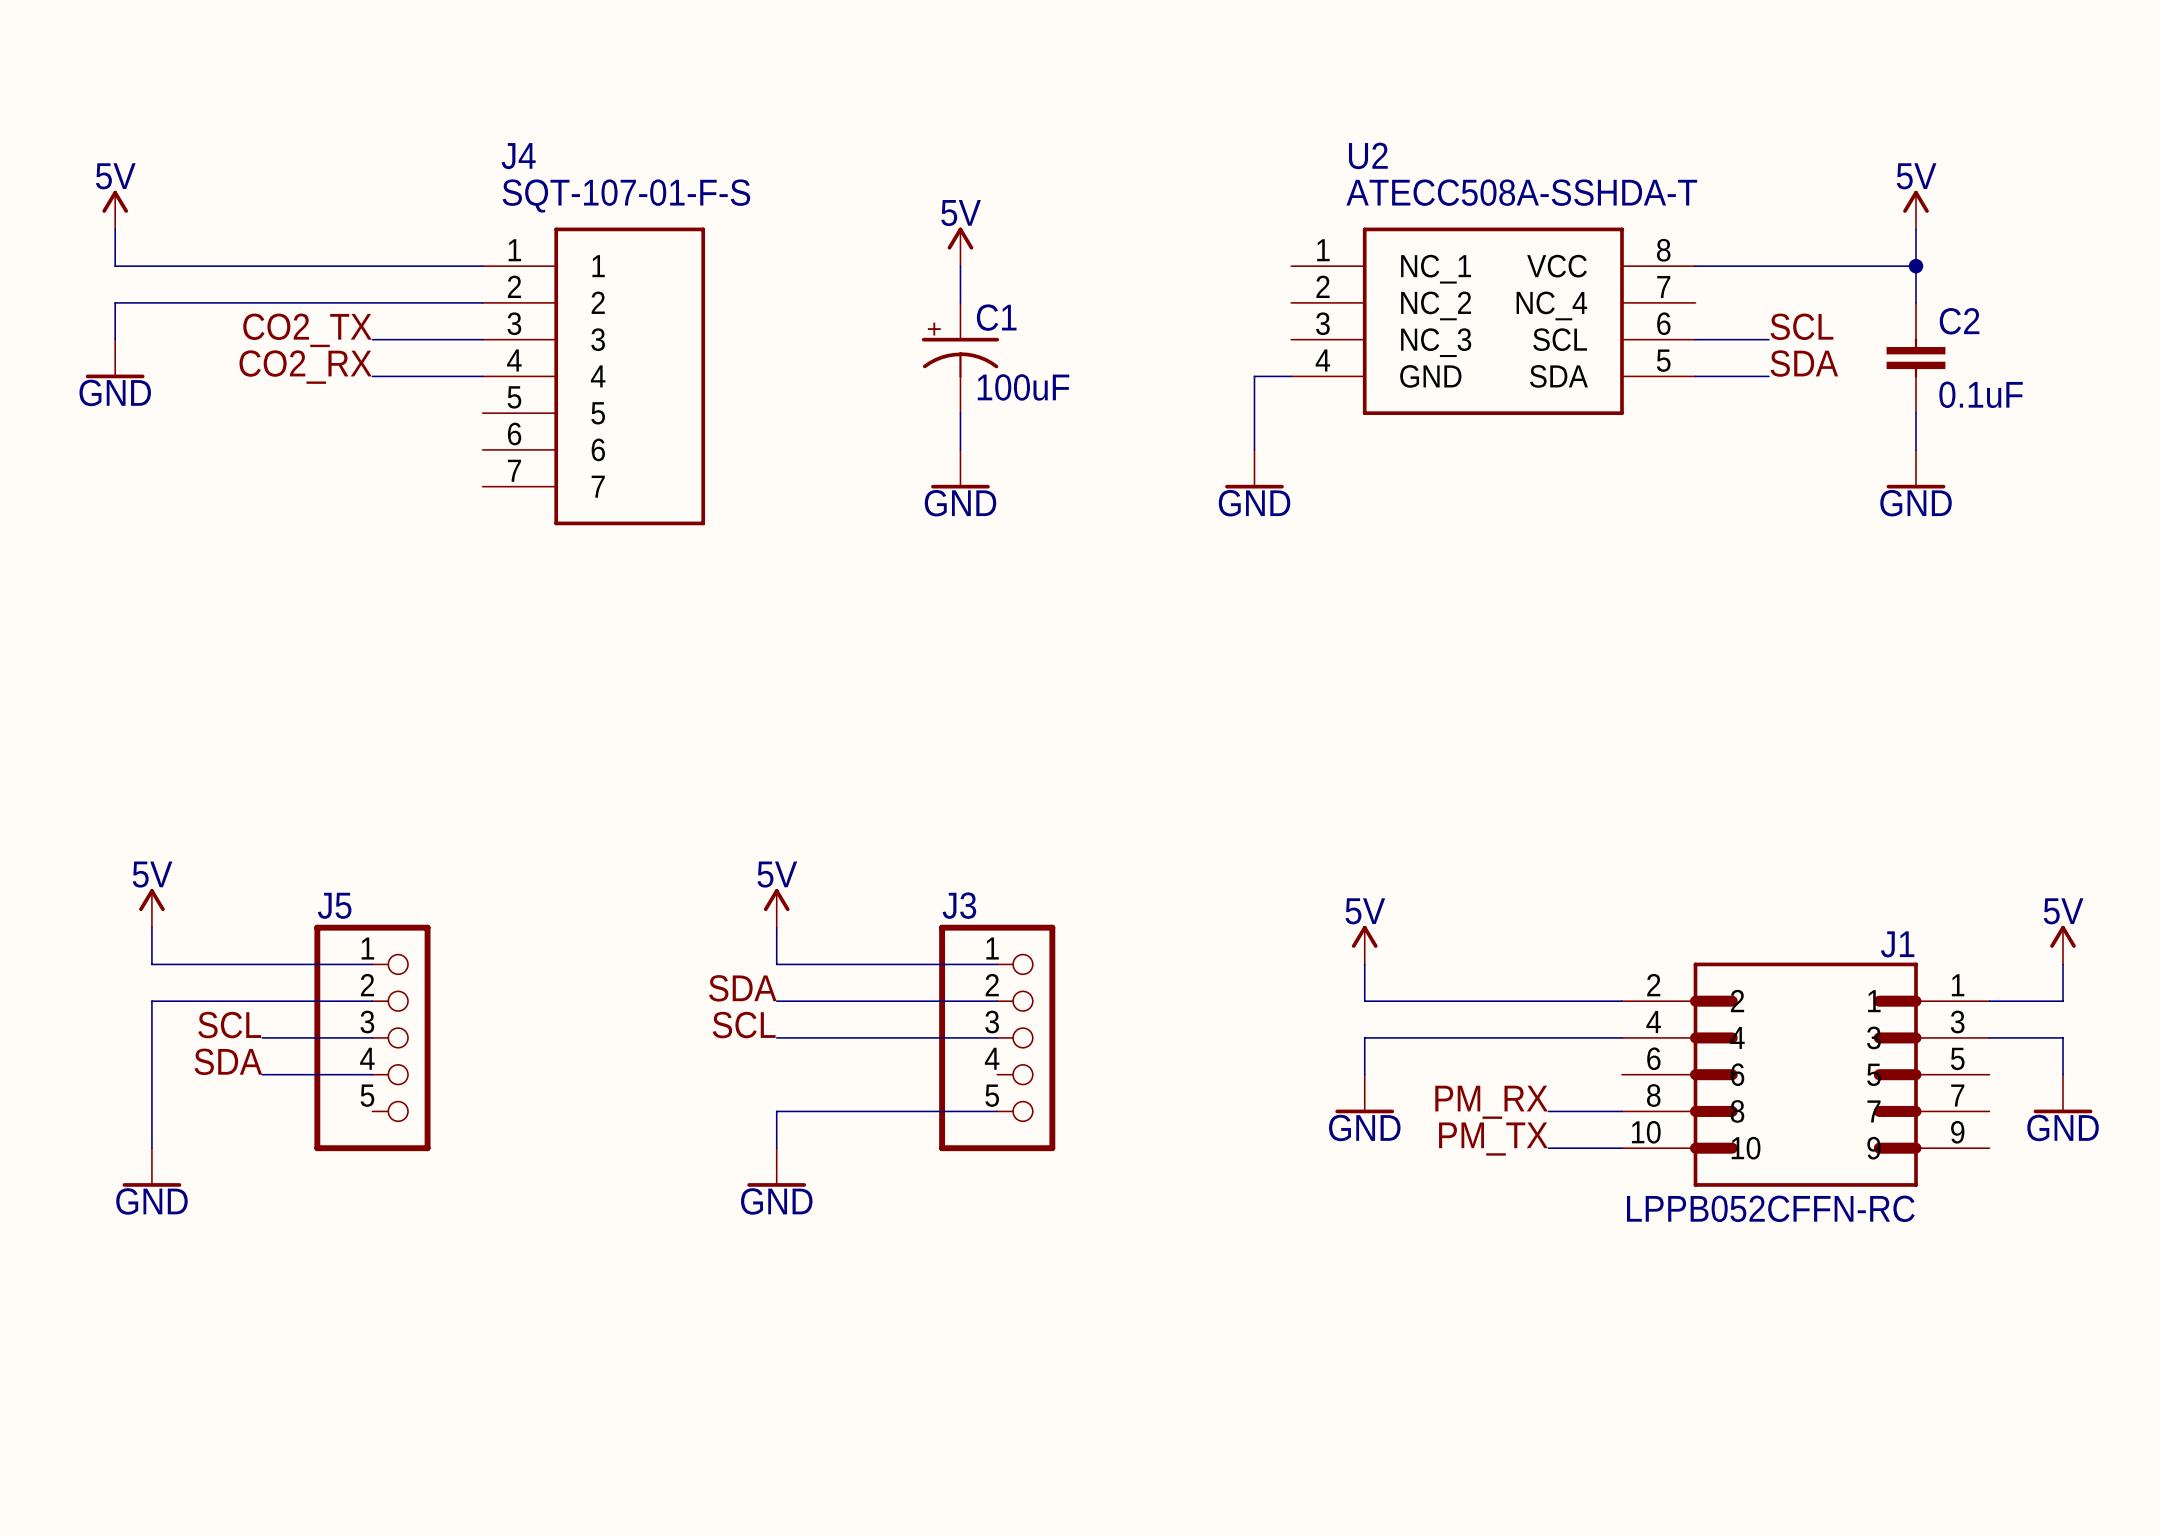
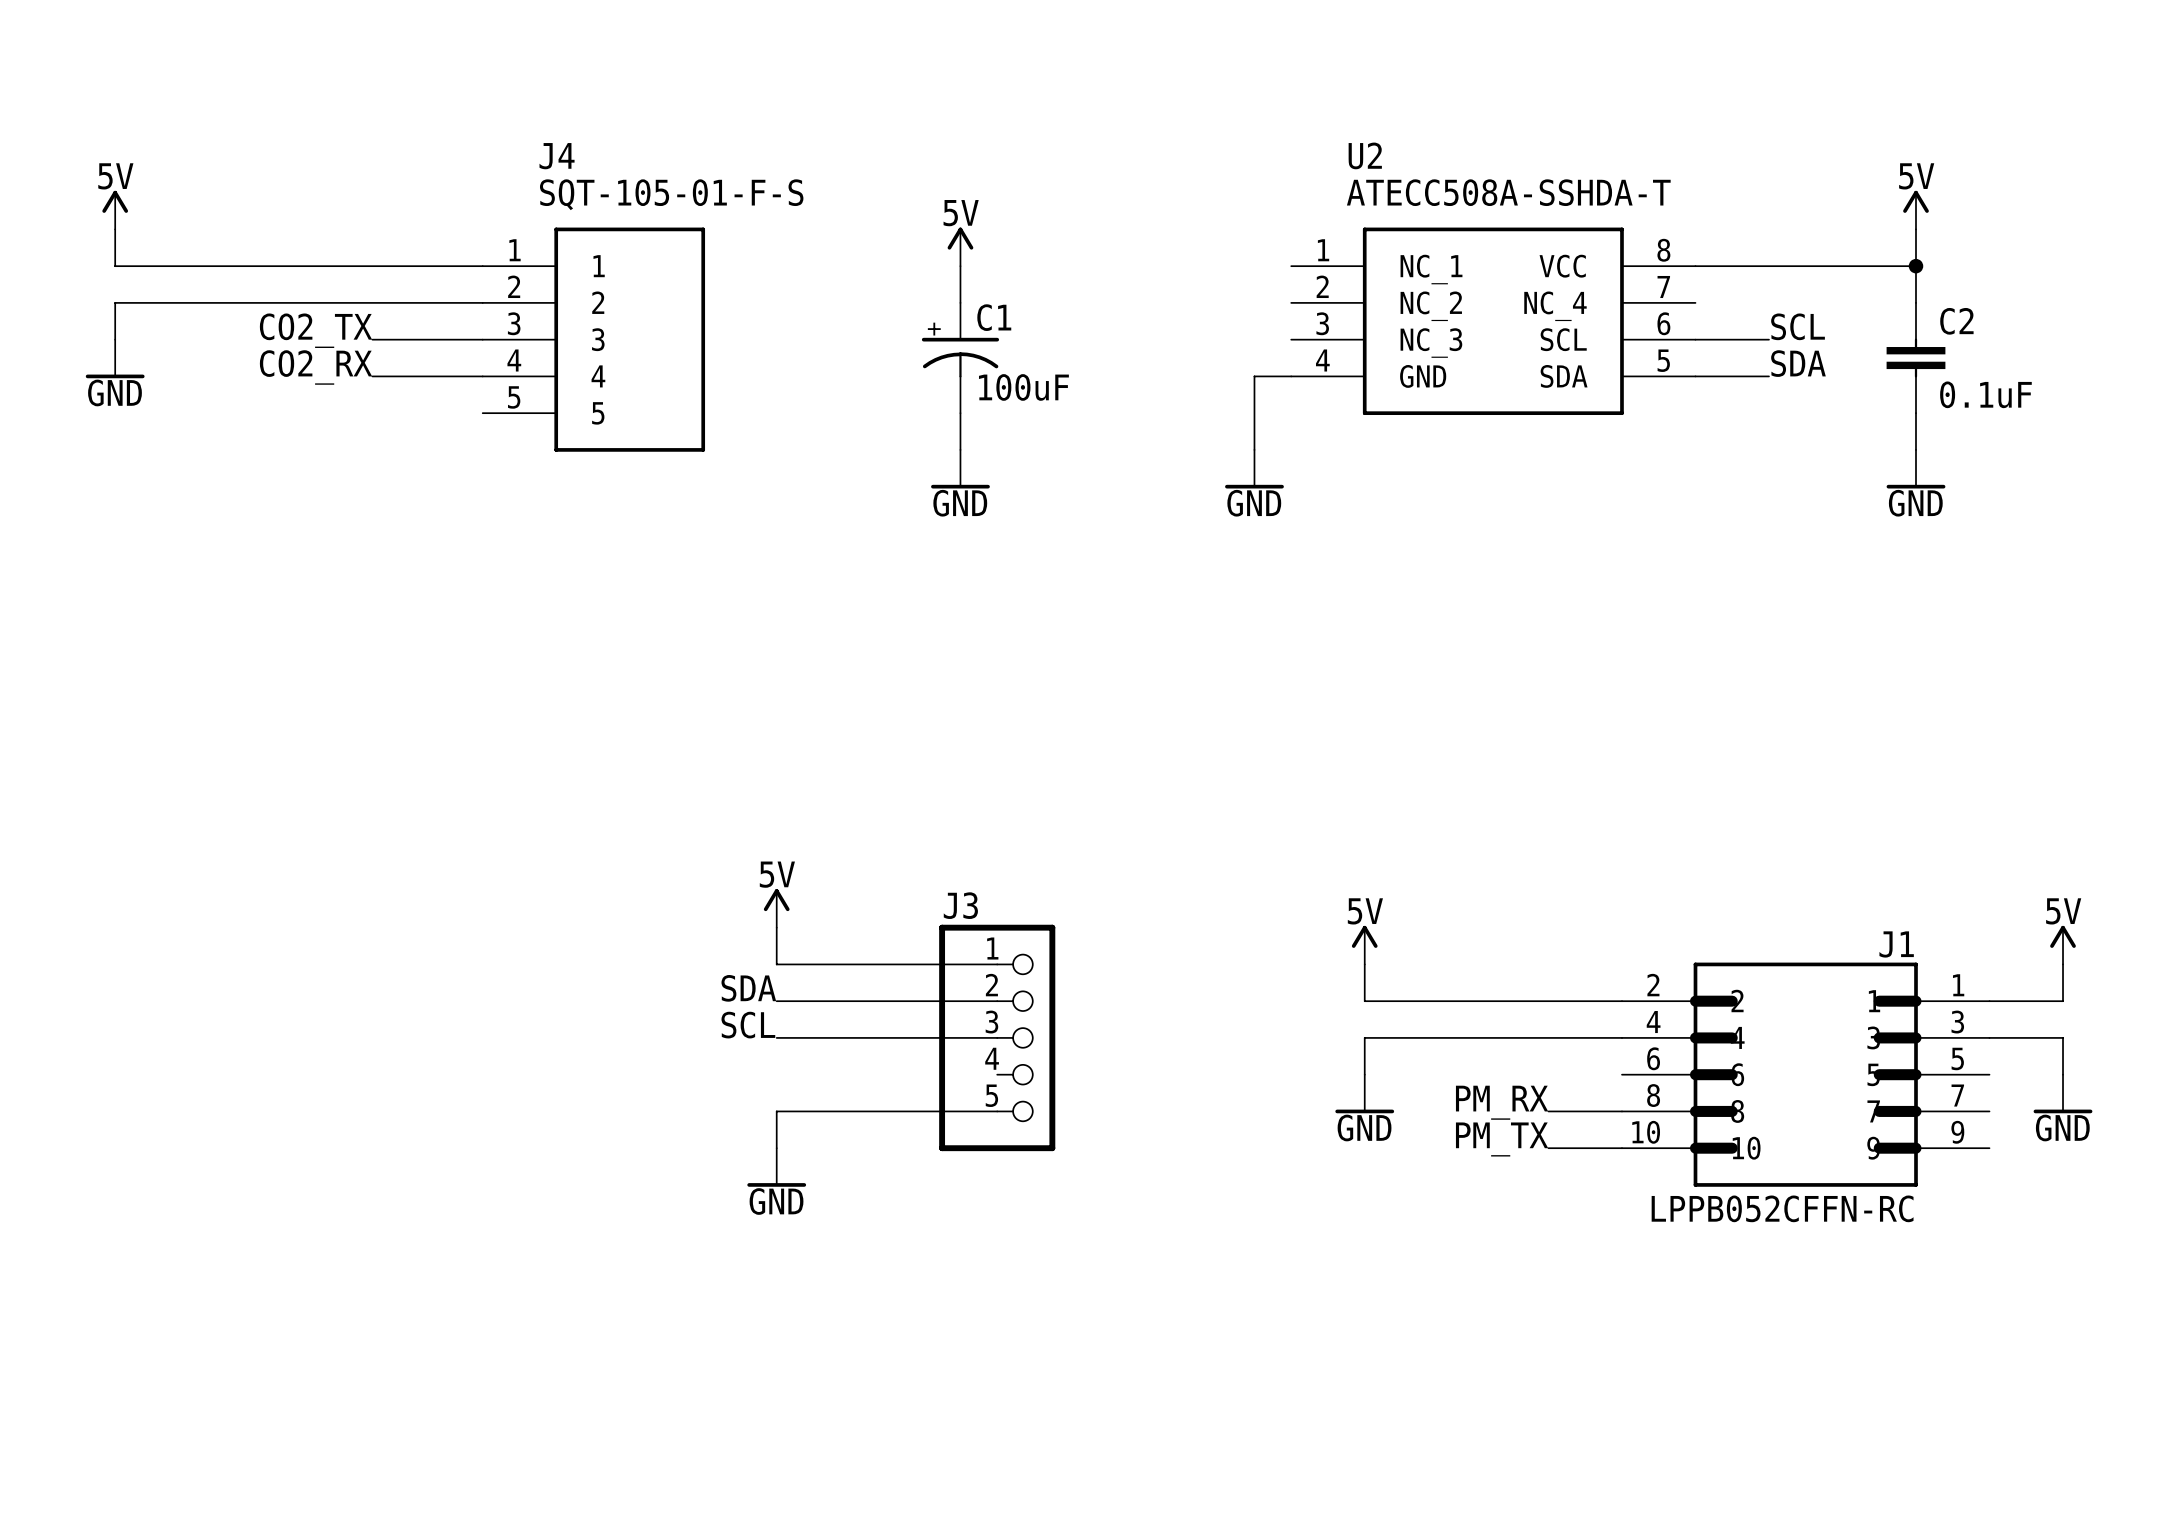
J4 name position: J4 (518, 156) -> J4 (557, 156)
J4 value: SQT-107-01-F-S (626, 196) -> SQT-105-01-F-S (671, 194)
J4 symbol: [482, 227, 706, 526] -> [482, 227, 706, 452]
power symbol: 5V (151, 908) -> none
wire: (151, 927) (151, 964) (372, 964) -> none
wire: (372, 1001) (151, 1001) (151, 1148) -> none
label: SCL (229, 1025) -> none
wire: (262, 1037) (372, 1037) -> none
J5: (372, 1037) -> none
label: SDA (228, 1061) -> none
wire: (262, 1074) (372, 1074) -> none
power symbol: GND (151, 1167) -> none

